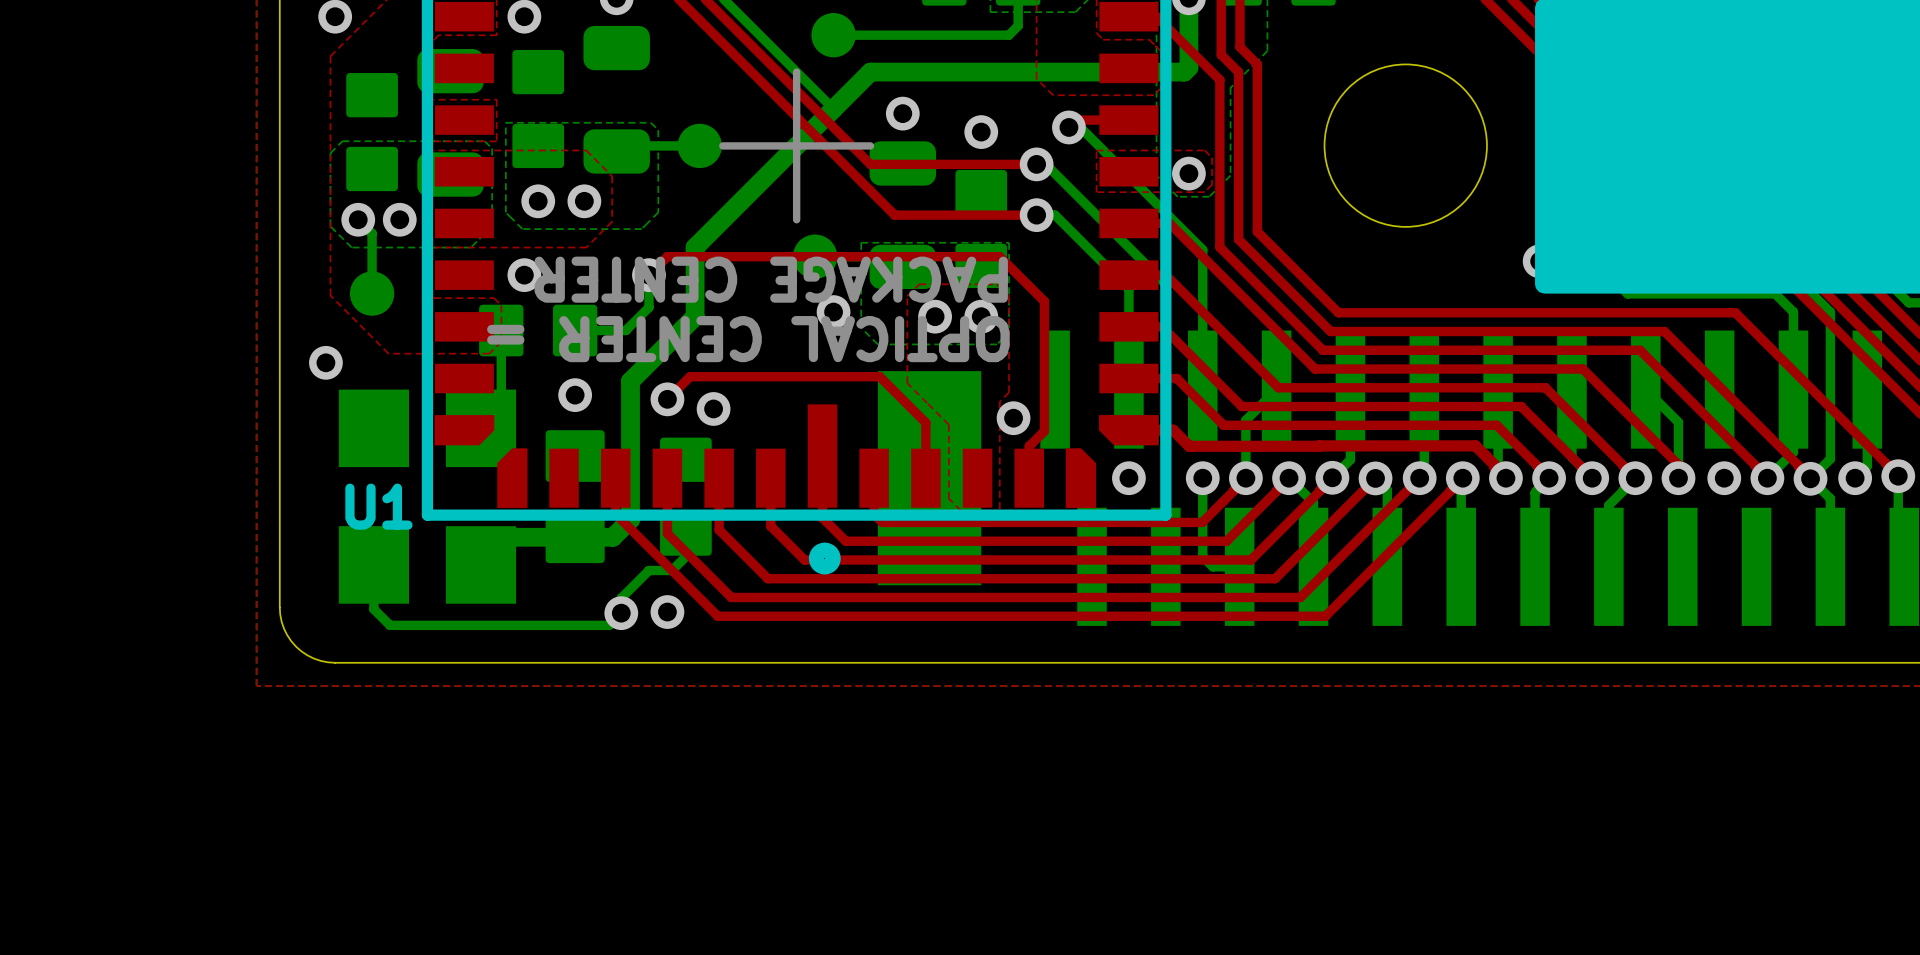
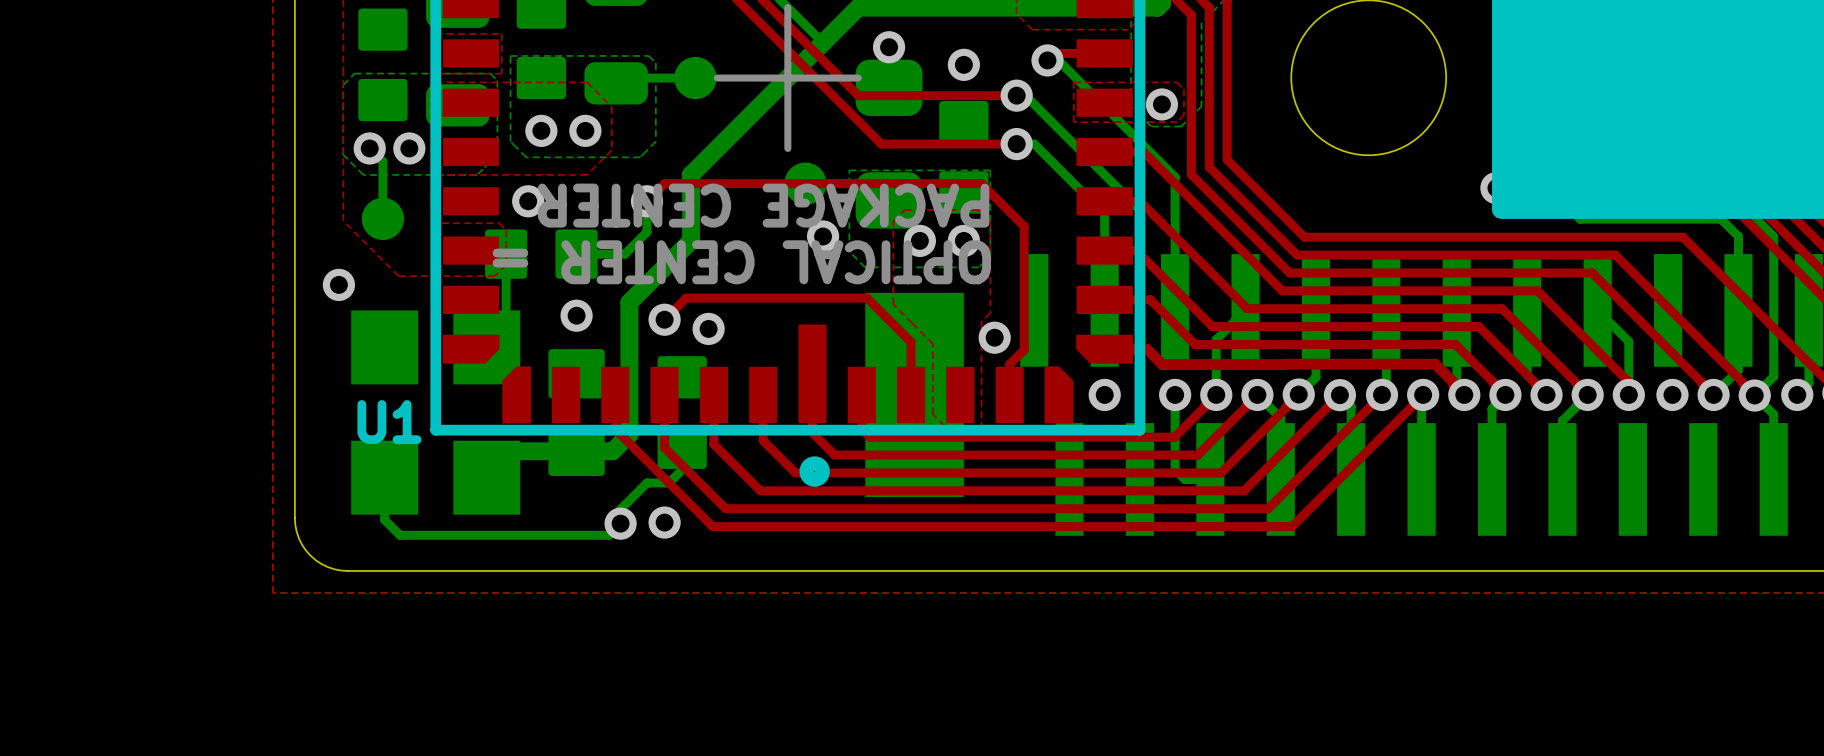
part footprint: [869, 141, 937, 289] -> [855, 59, 923, 229]

